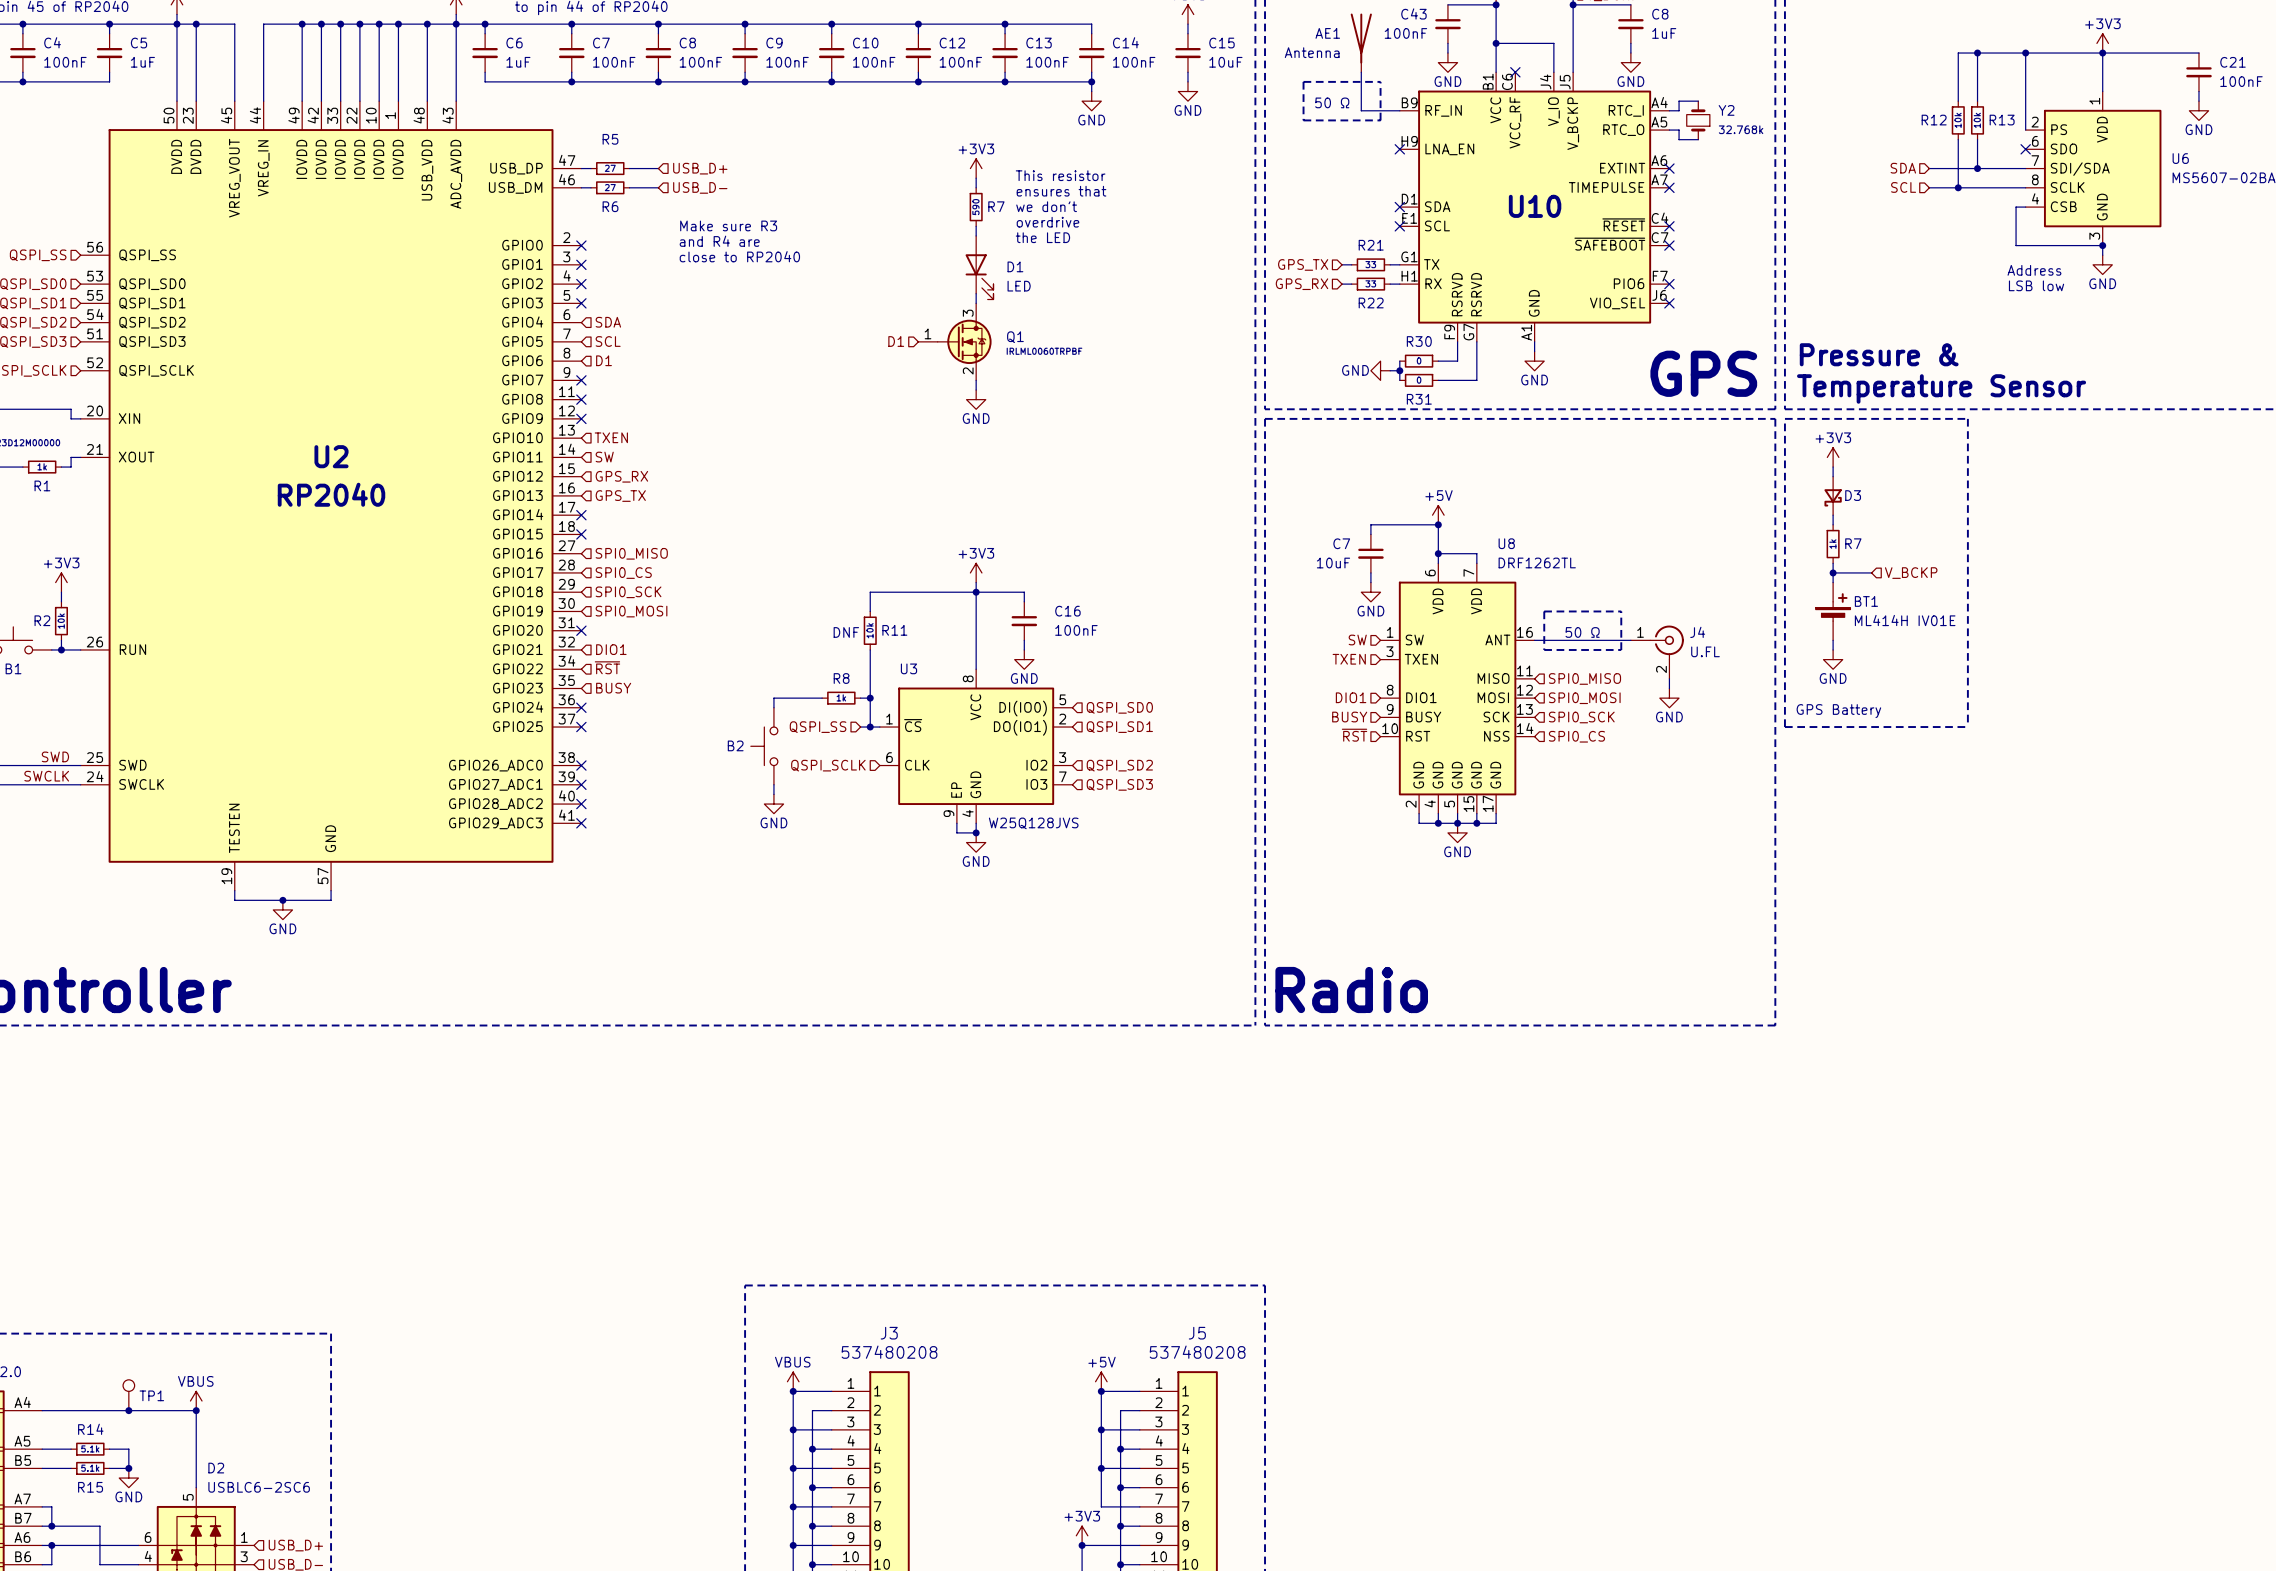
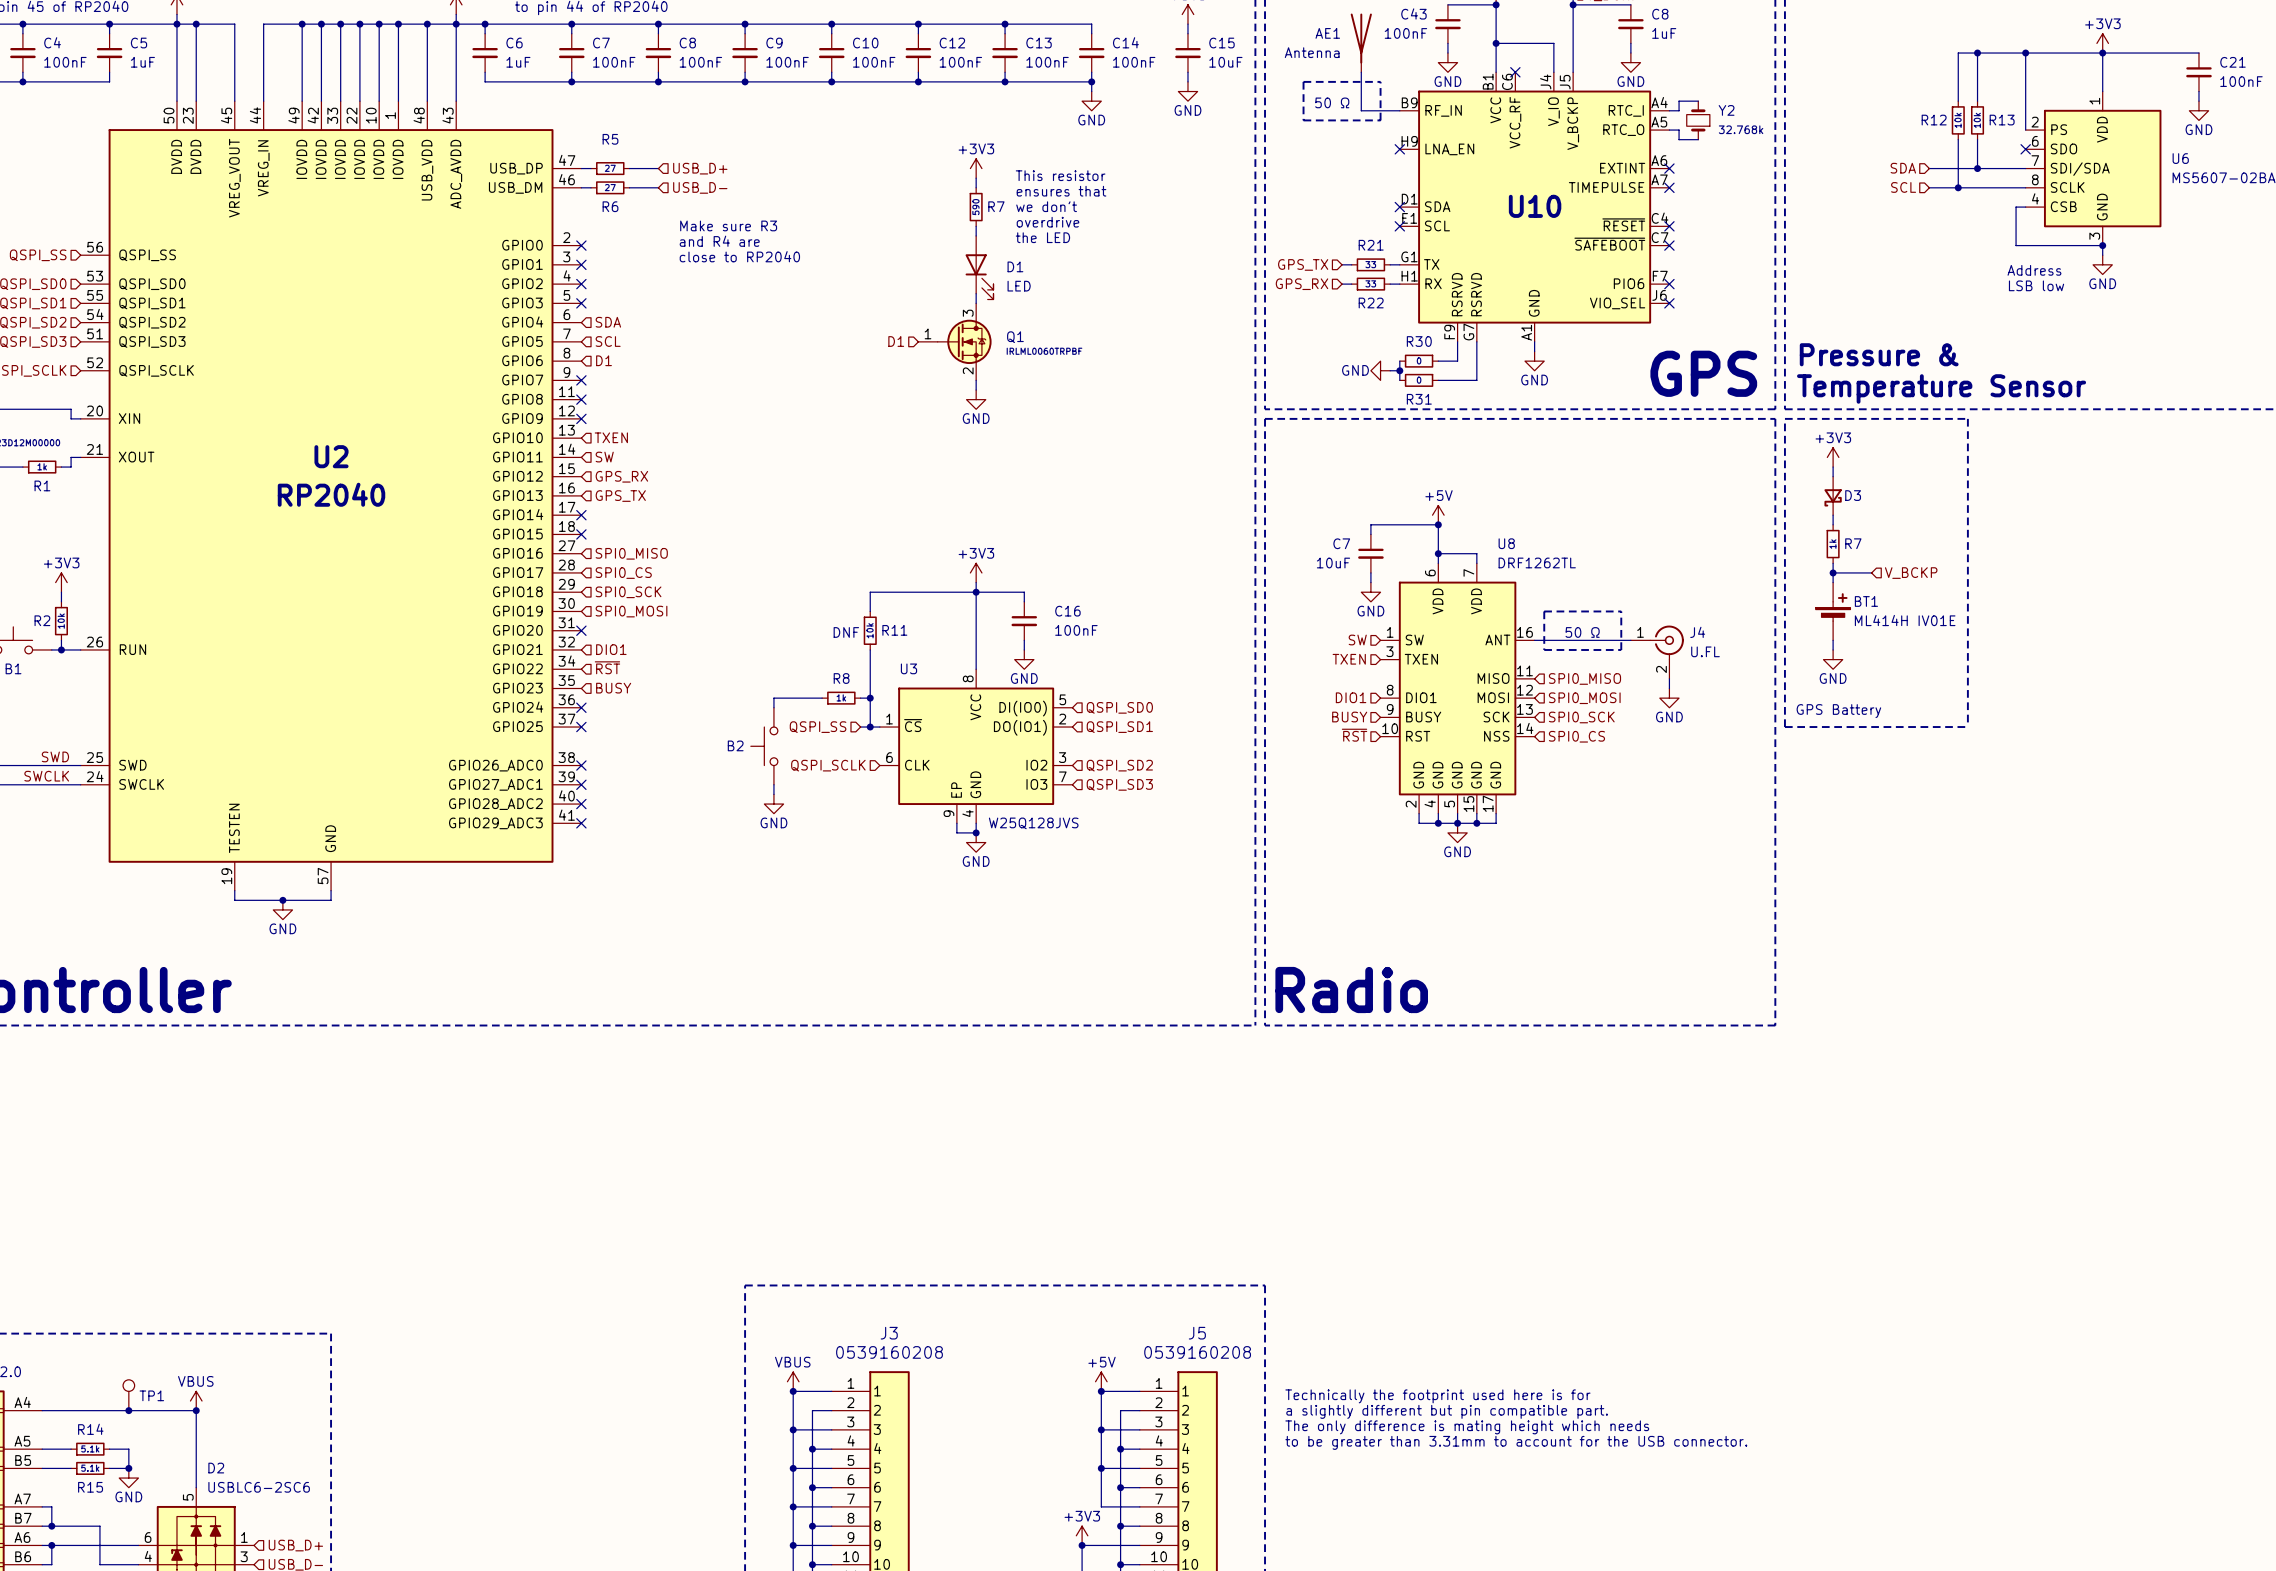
J3 value: 537480208 (889, 1352) -> 0539160208 (889, 1352)
J5 value: 537480208 (1197, 1352) -> 0539160208 (1197, 1352)
text: none -> Technically the footprint used here is for (1437, 1396)
text: none -> a slightly different but pin compatible part. (1447, 1411)
text: none -> The only difference is mating height which needs (1467, 1427)
text: none -> to be greater than 3.31mm to account for the USB connector. (1516, 1442)

